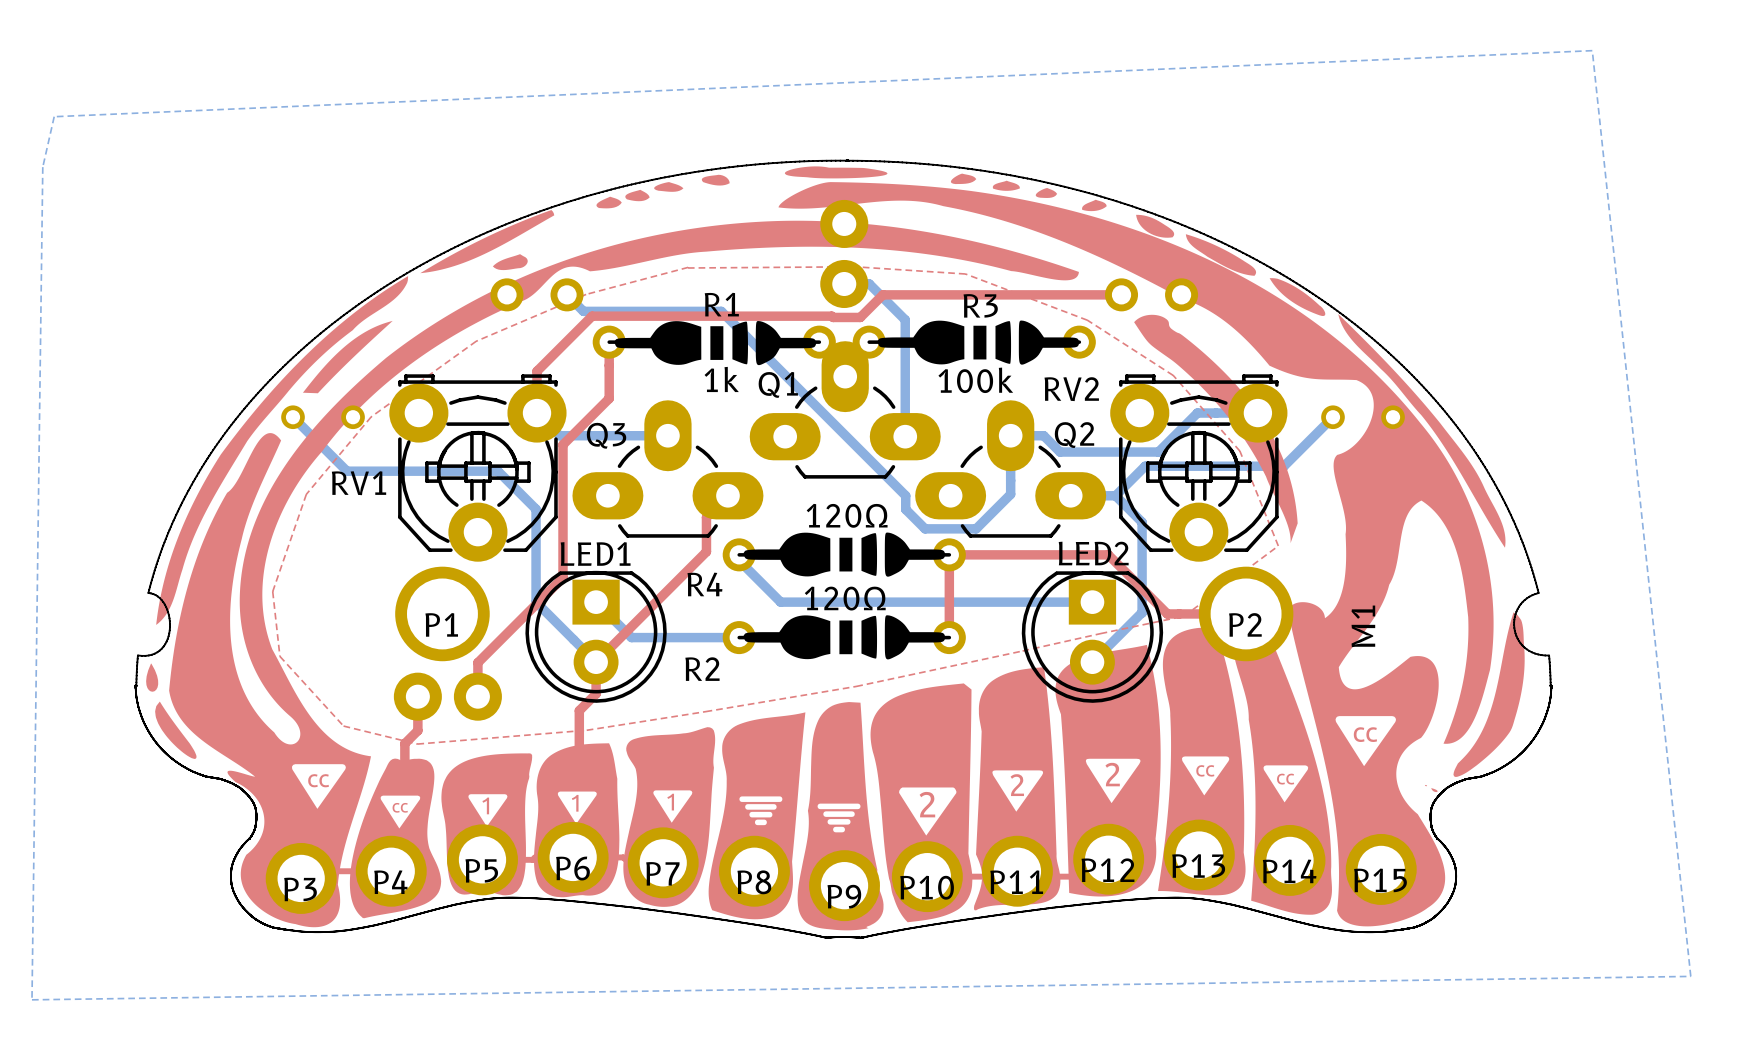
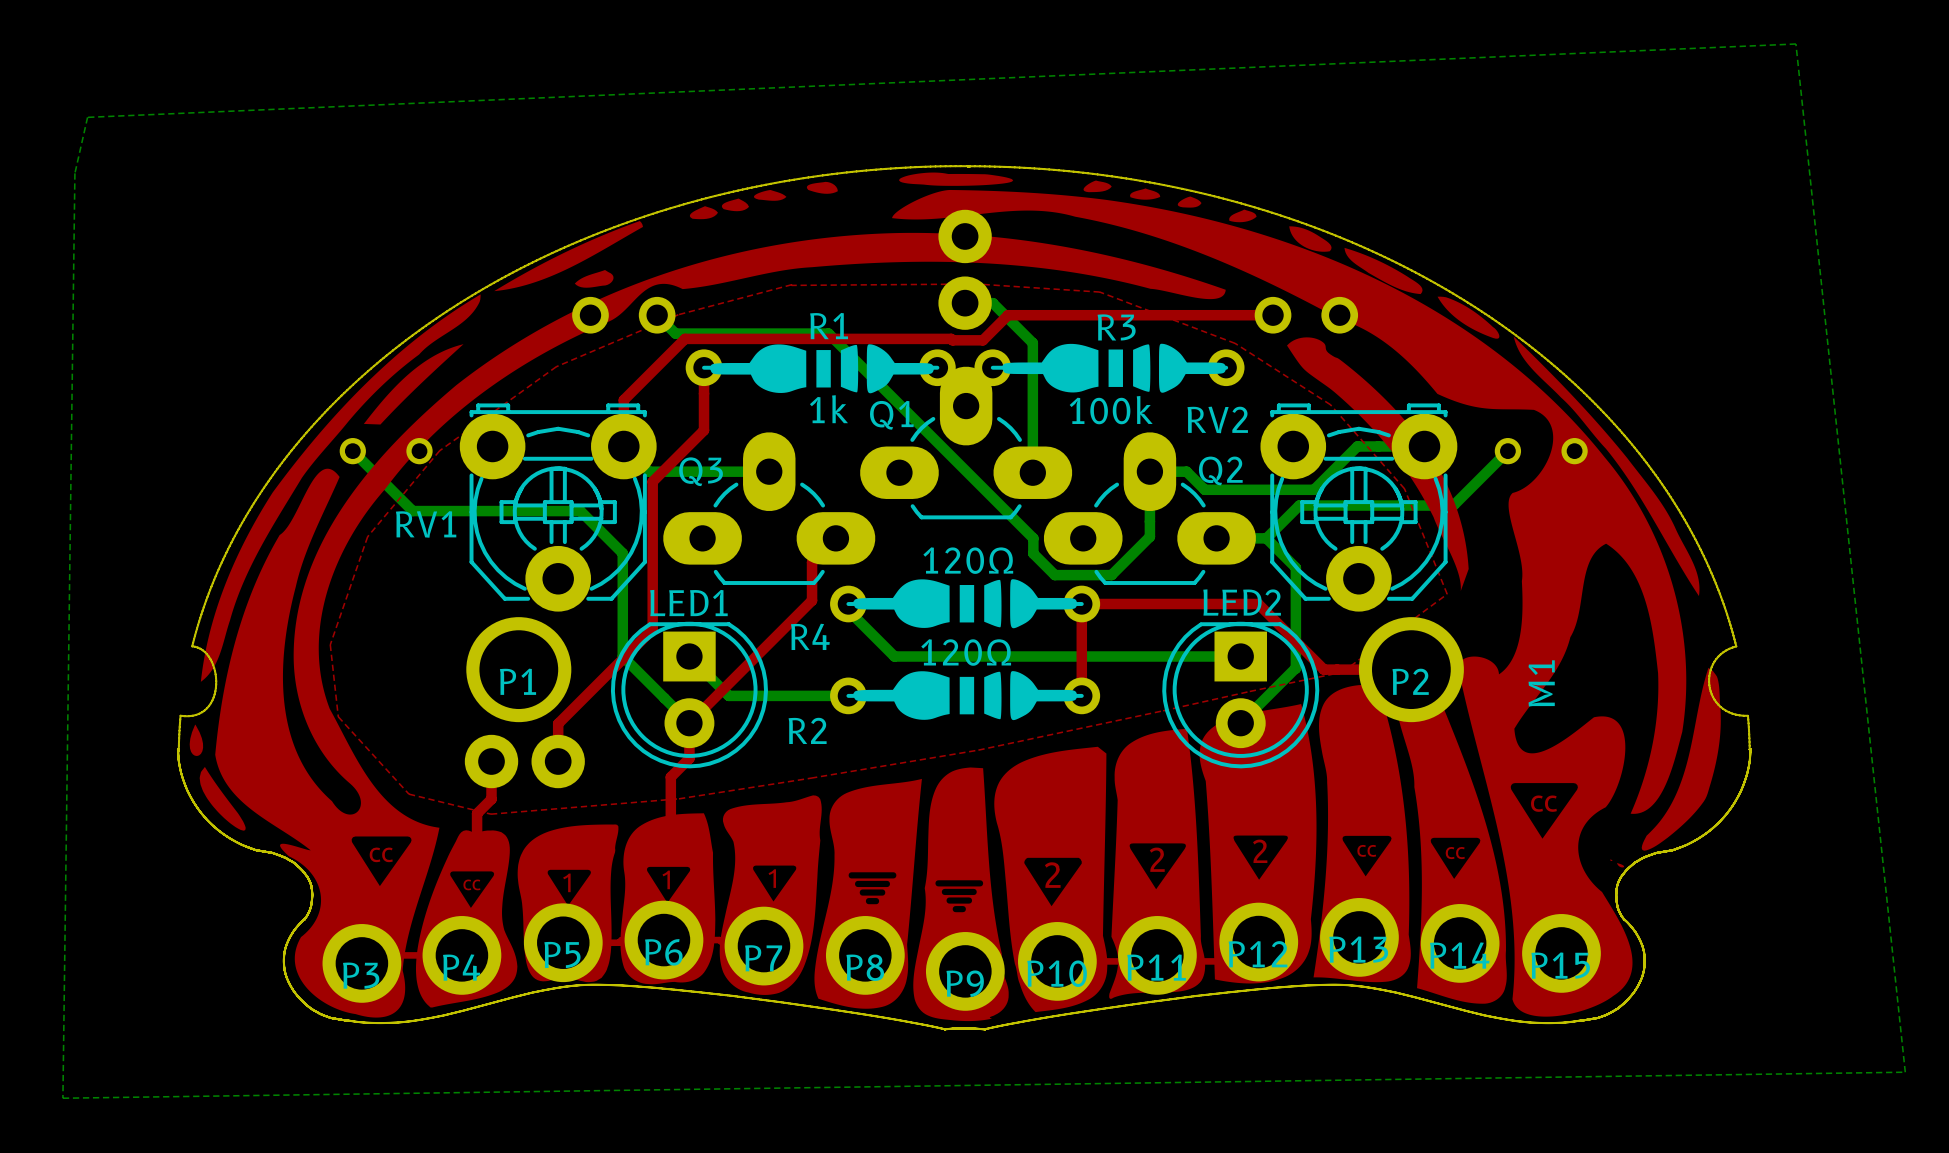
drawing shape: [134, 159, 1553, 939] -> [176, 165, 1752, 1031]

